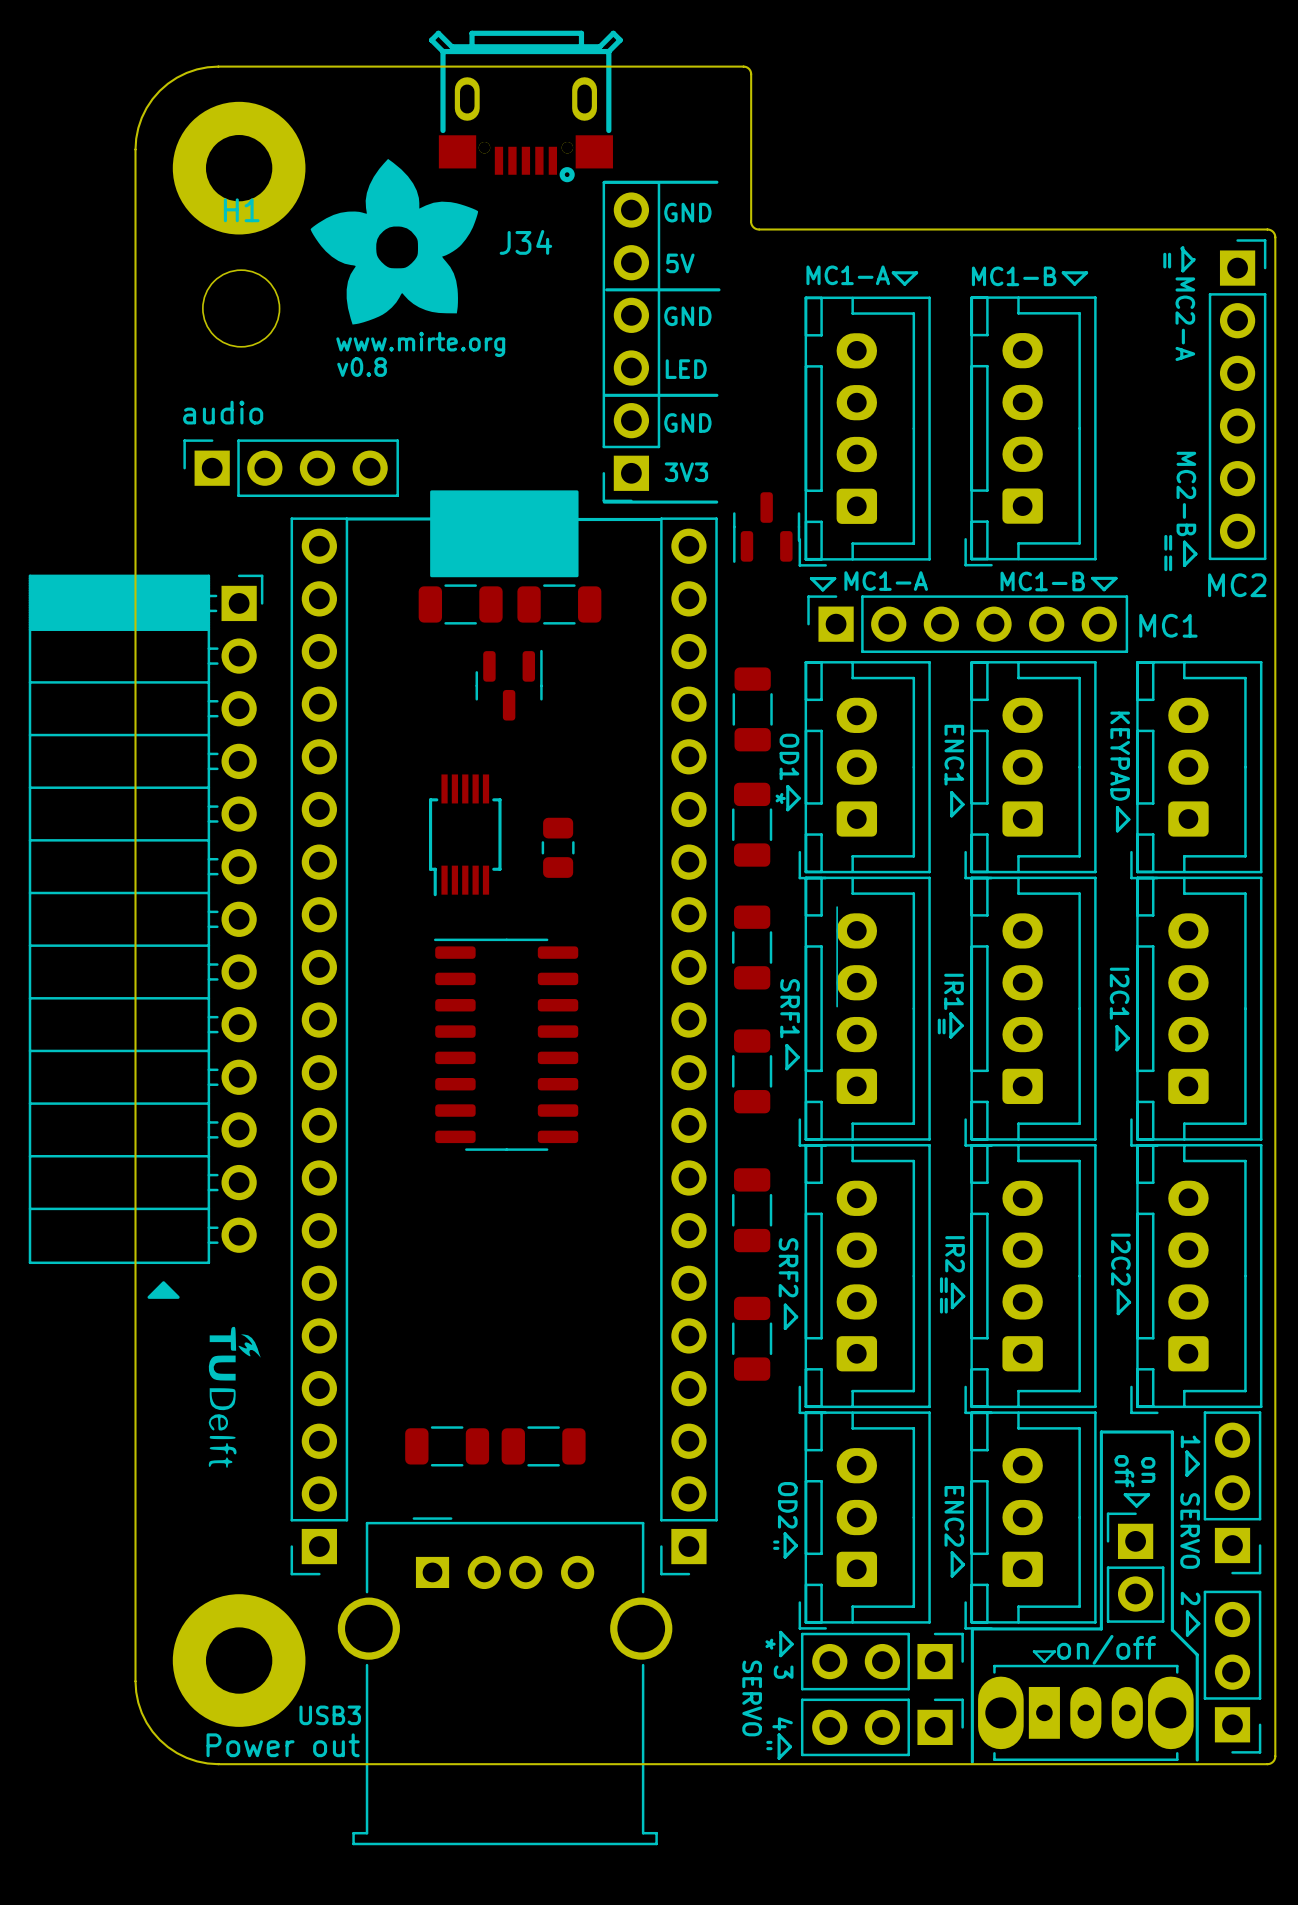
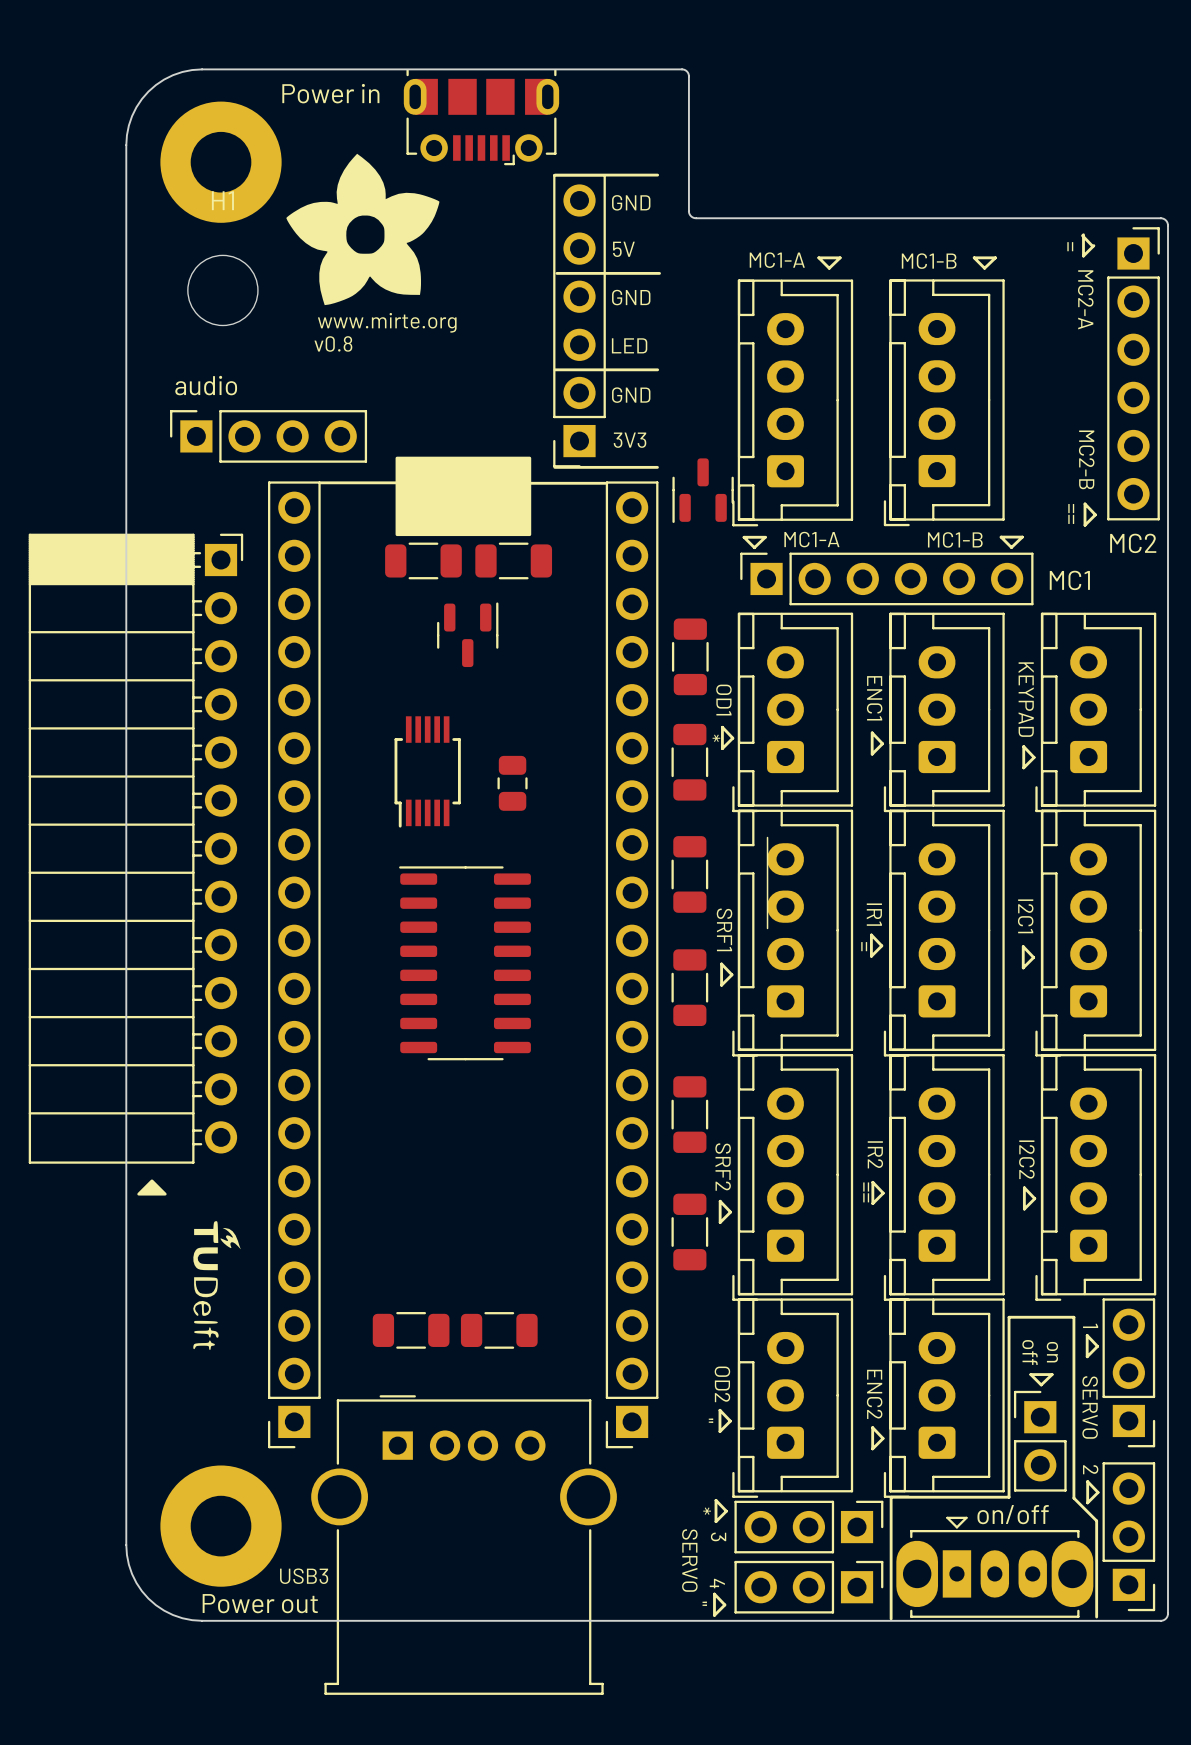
J34: (525, 106) -> none
part: none -> Power in (481, 117)

